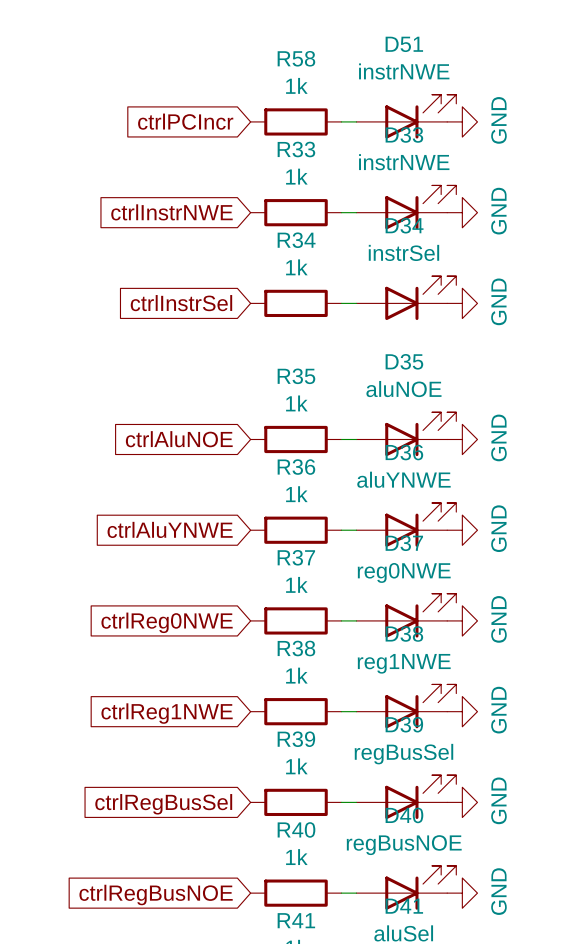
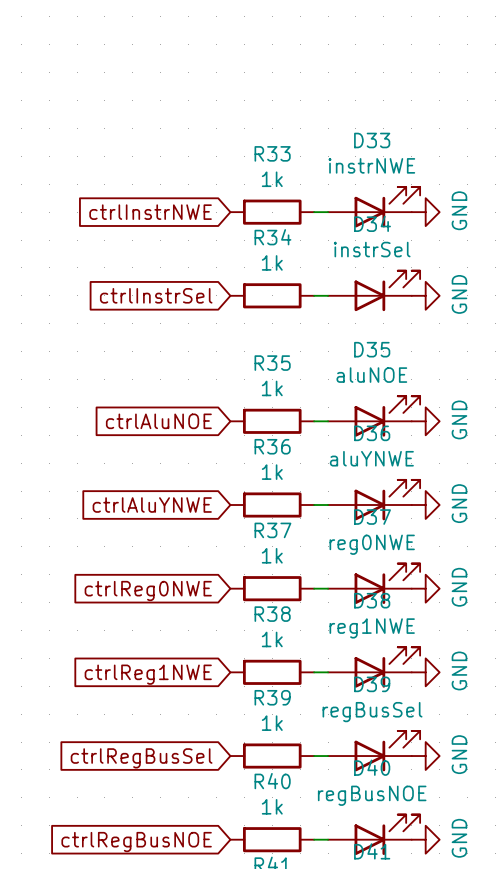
D51: instrNWE (406, 116) -> none
global label: ctrlPCIncr (185, 121) -> none
R58: 1k (296, 121) -> none
wire: (341, 121) (356, 121) -> none
power symbol: GND (462, 121) -> none

